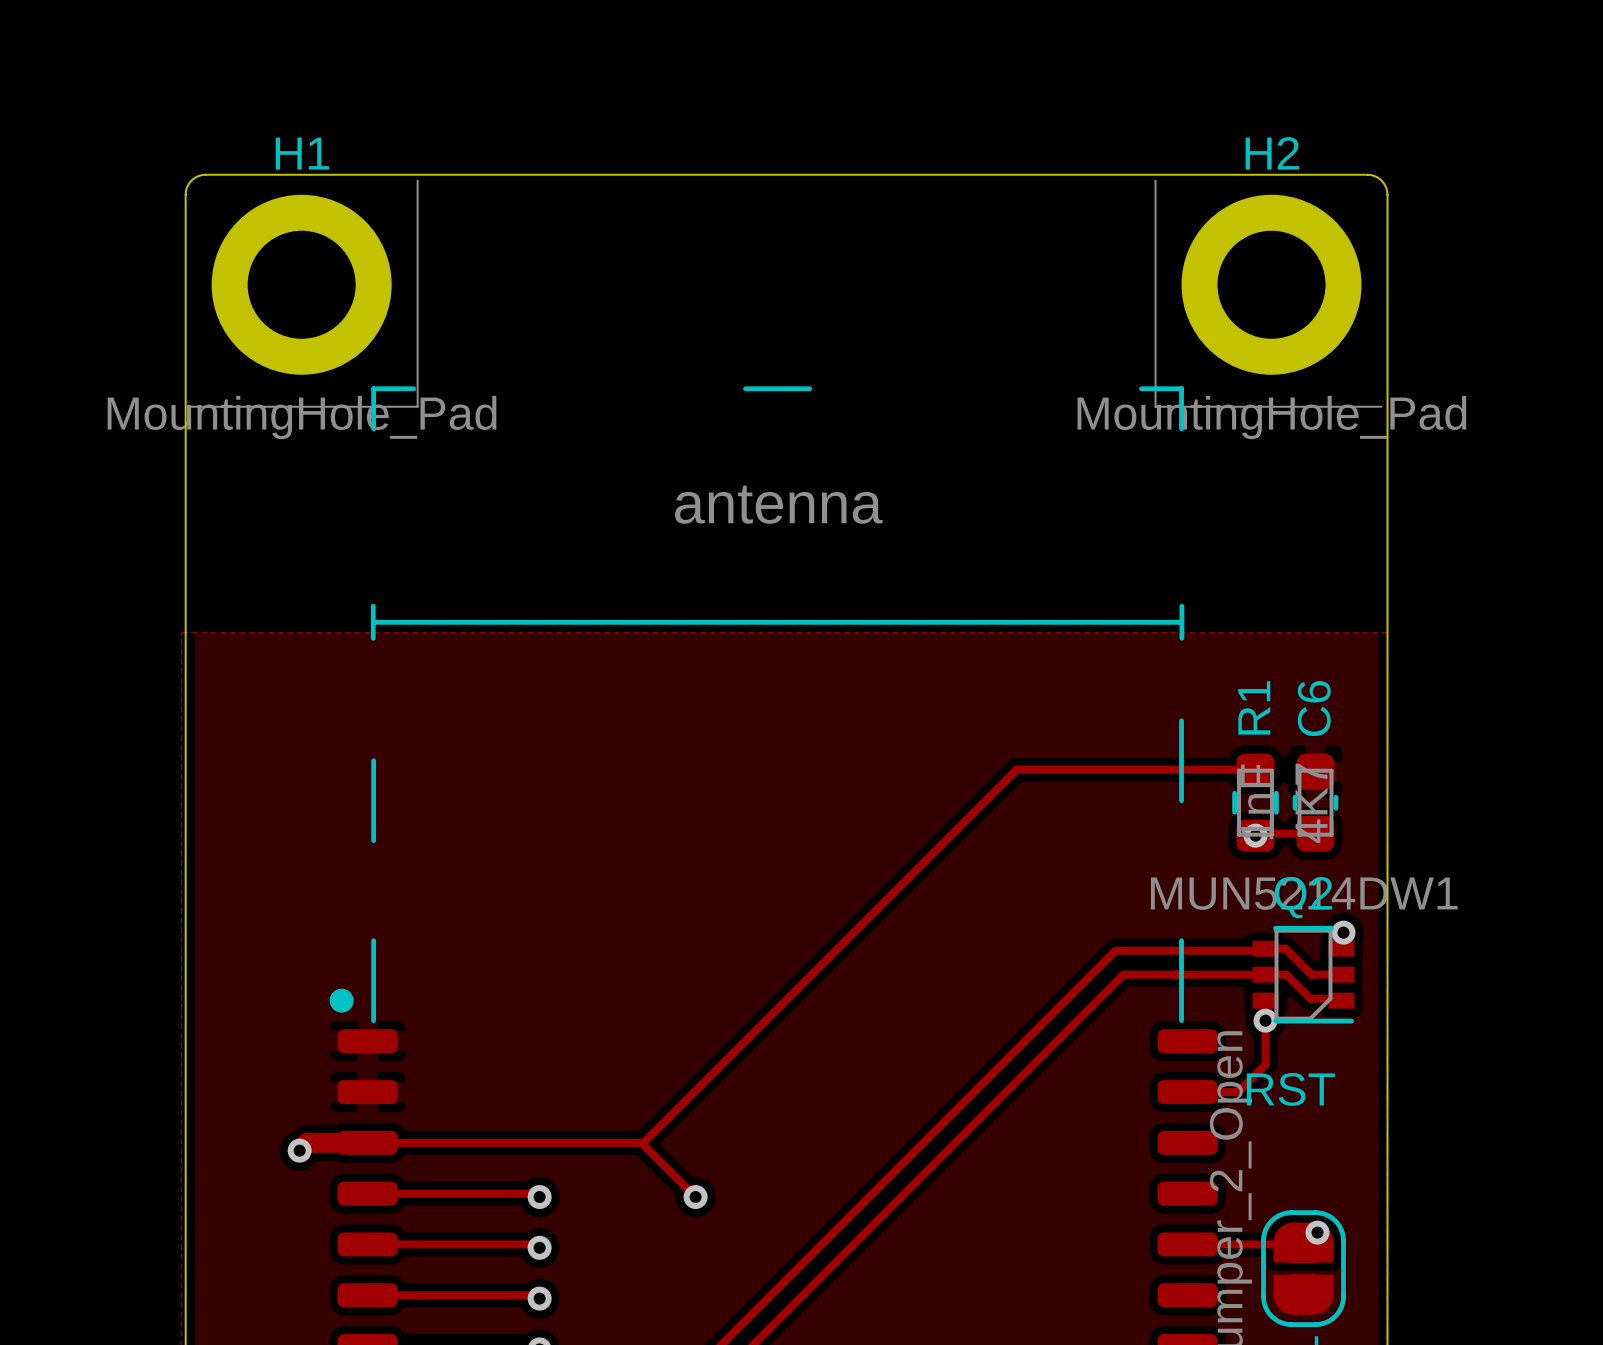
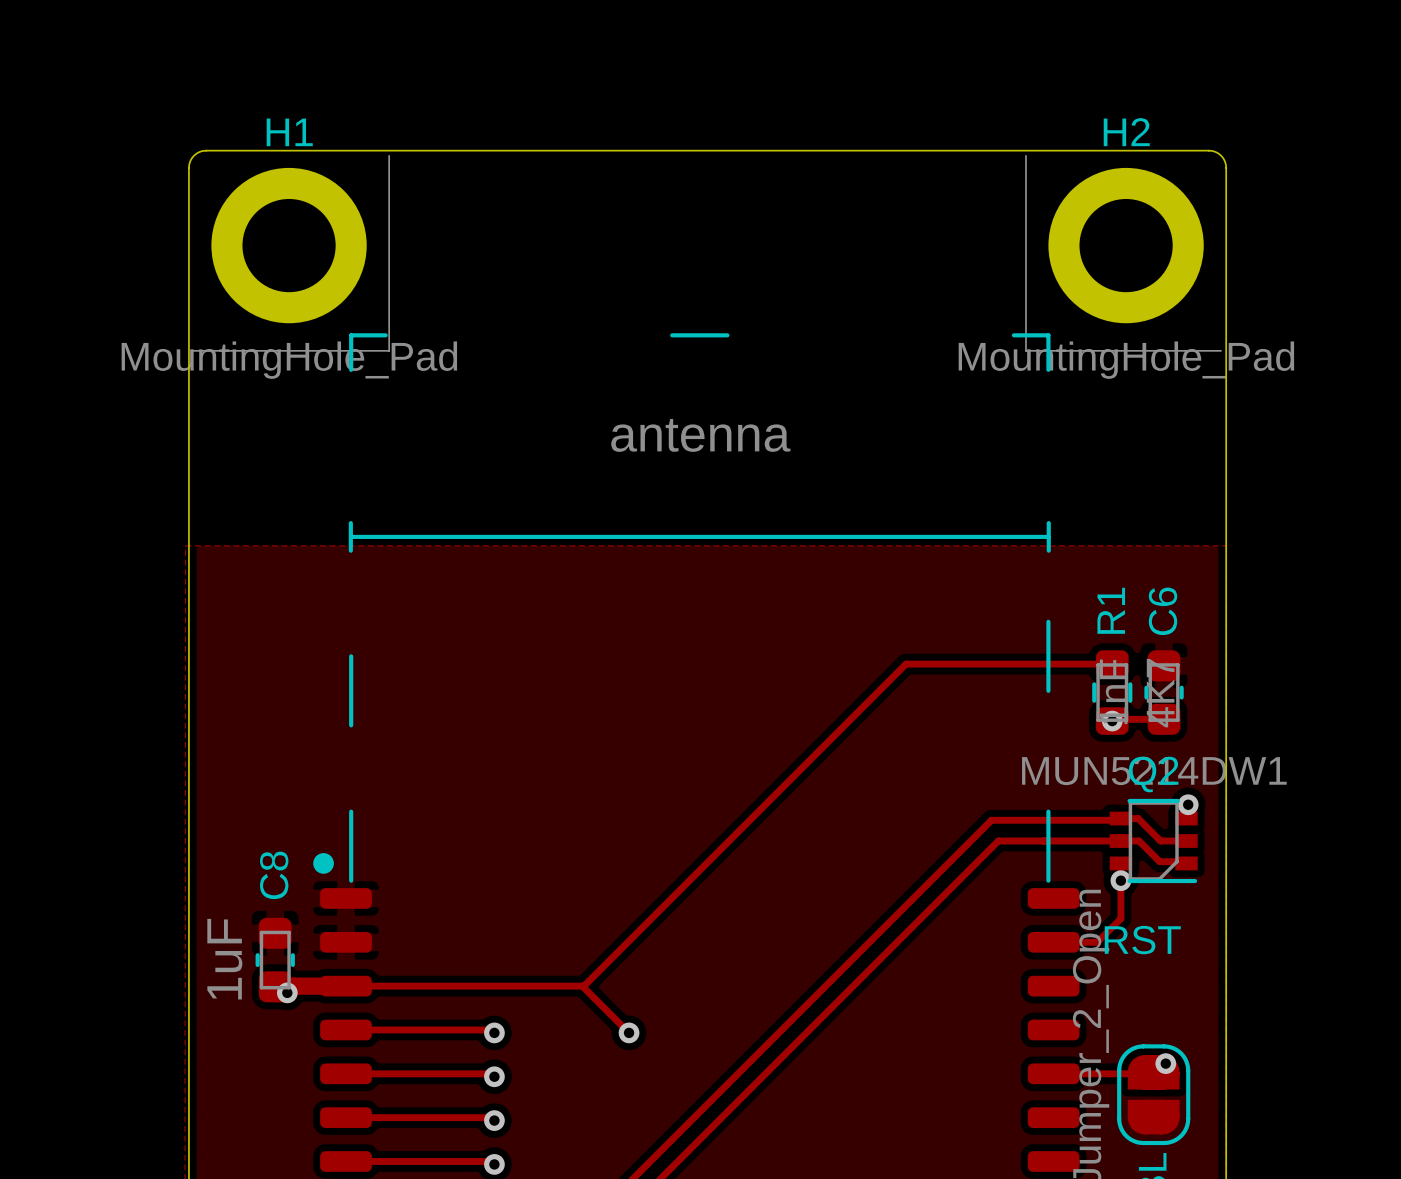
C8: none -> 1uF (275, 960)

